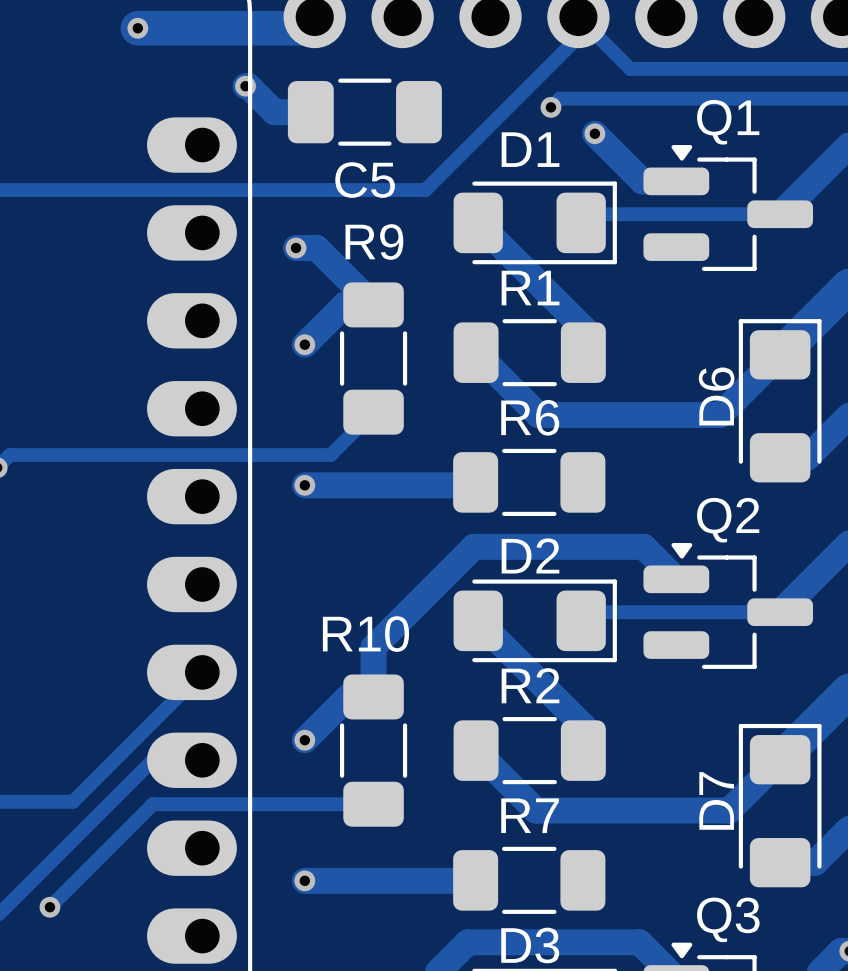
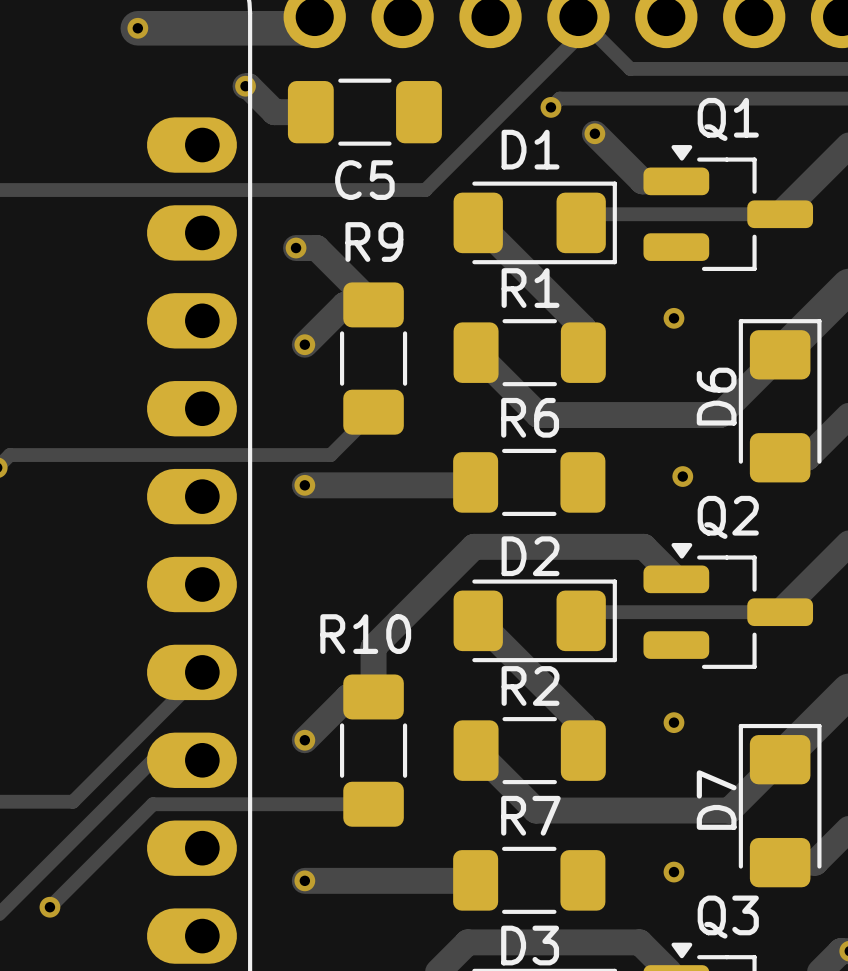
via: none -> (673, 318)
via: none -> (682, 476)
via: none -> (673, 722)
via: none -> (673, 872)

